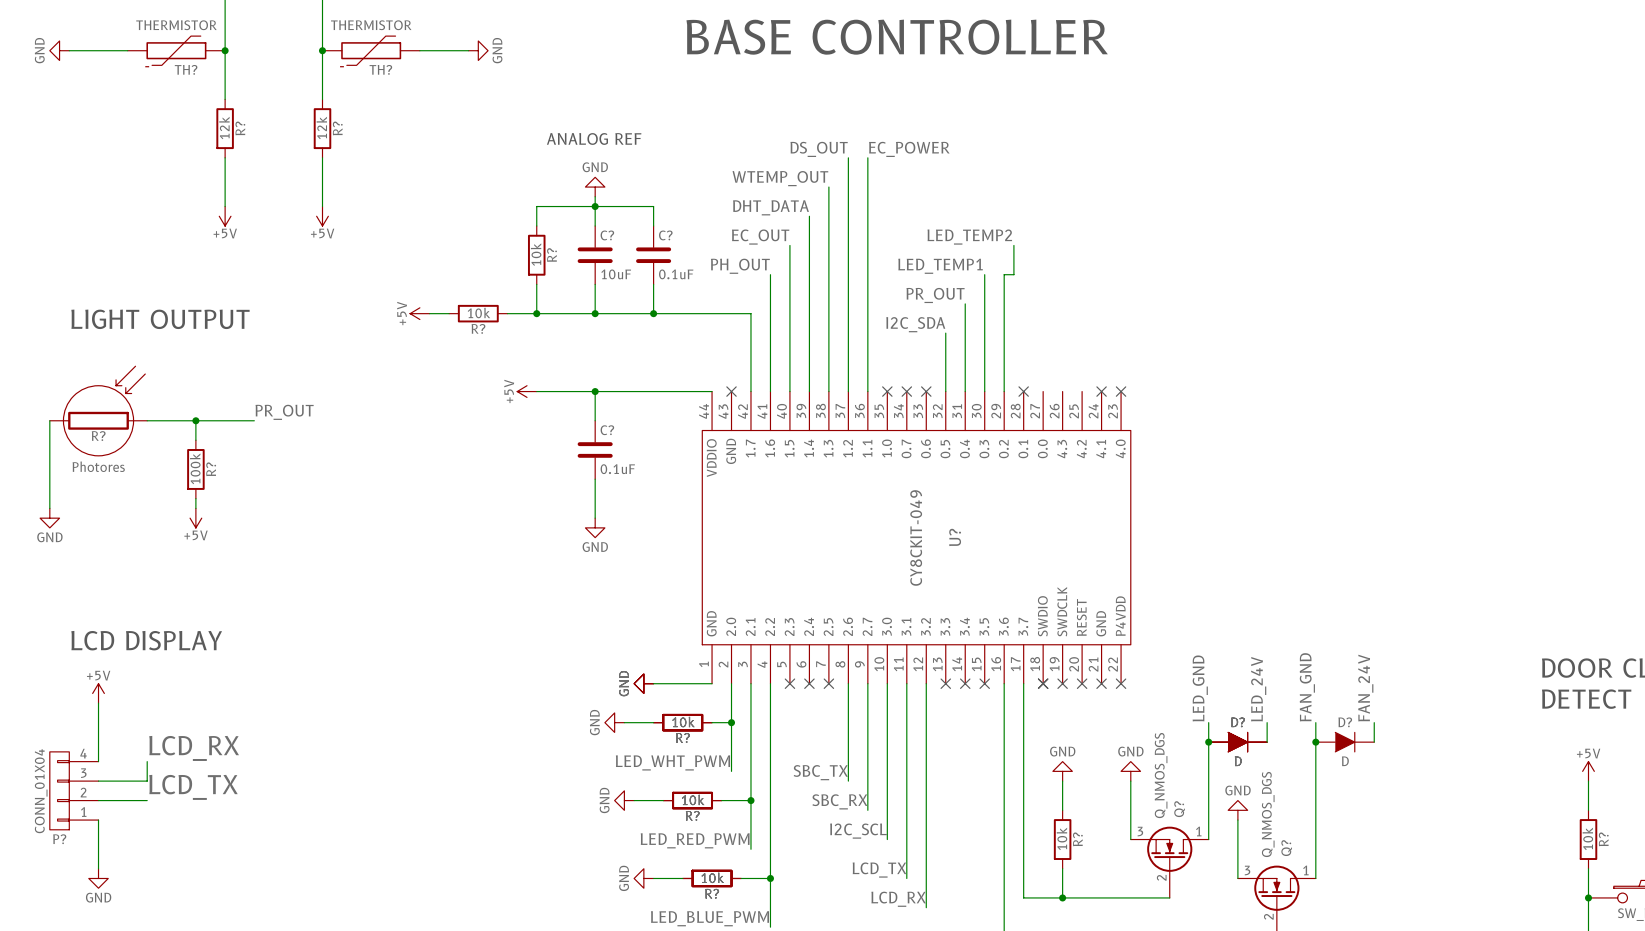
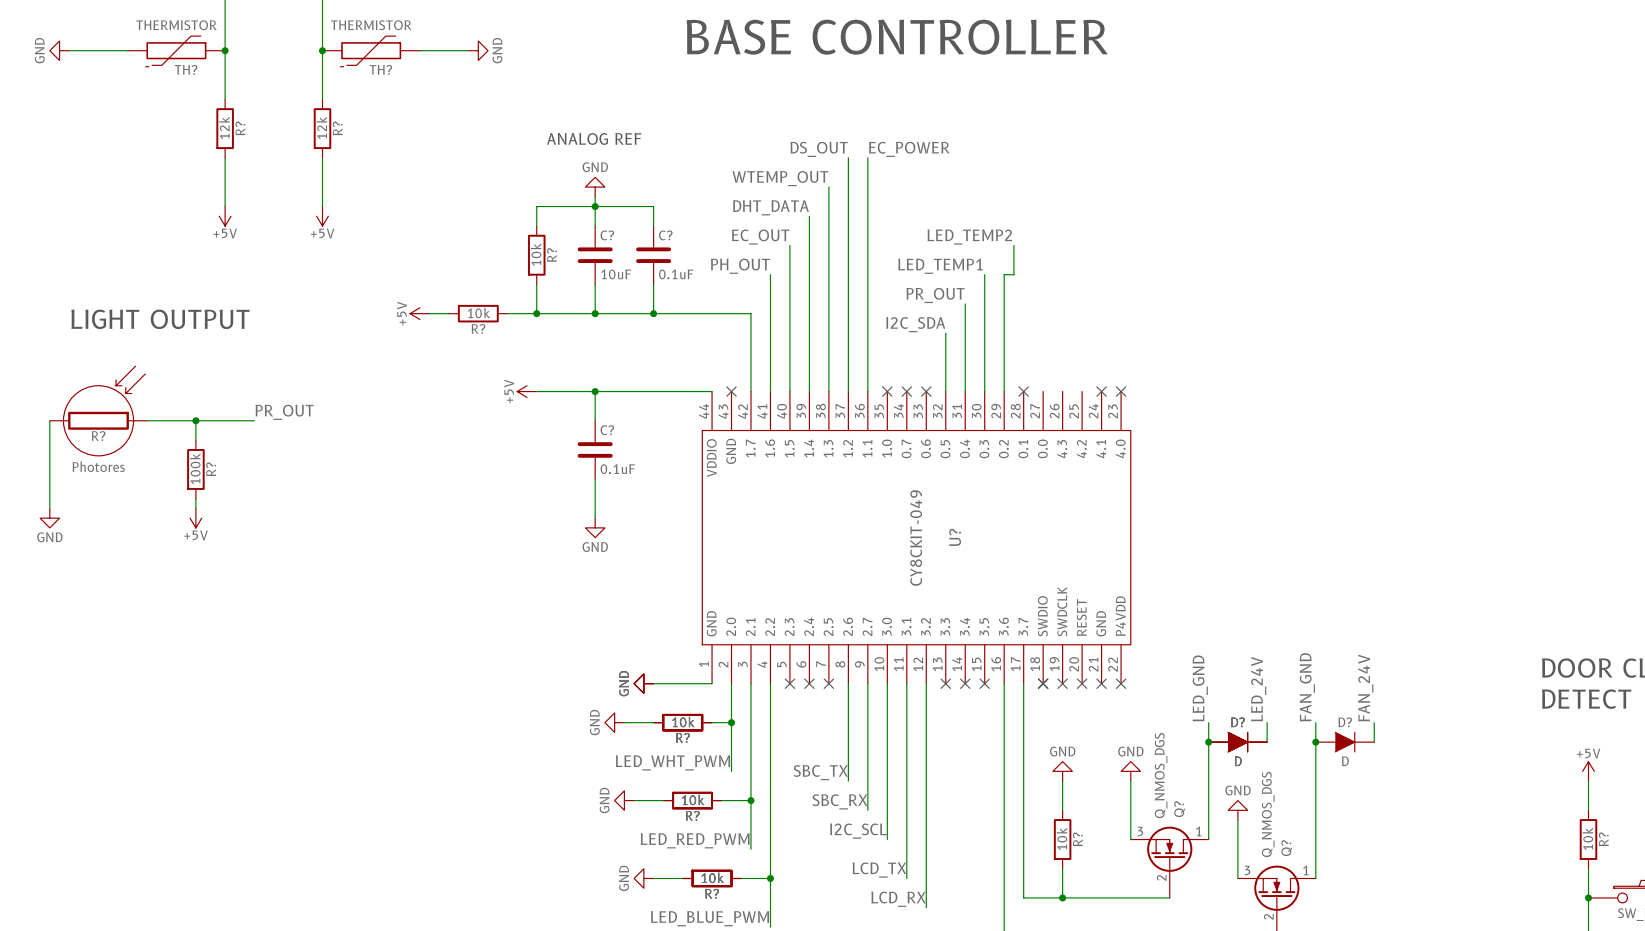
text: LCD DISPLAY (146, 640) -> none
power symbol: +5V (98, 693) -> none
wire: (98, 703) (98, 761) -> none
label: LCD_RX (194, 748) -> none
wire: (147, 761) (147, 781) (98, 781) -> none
label: LCD_TX (193, 787) -> none
P?: CONN_01X04 (74, 790) -> none
wire: (98, 800) (147, 800) -> none
wire: (98, 820) (98, 868) -> none
power symbol: GND (98, 878) -> none

